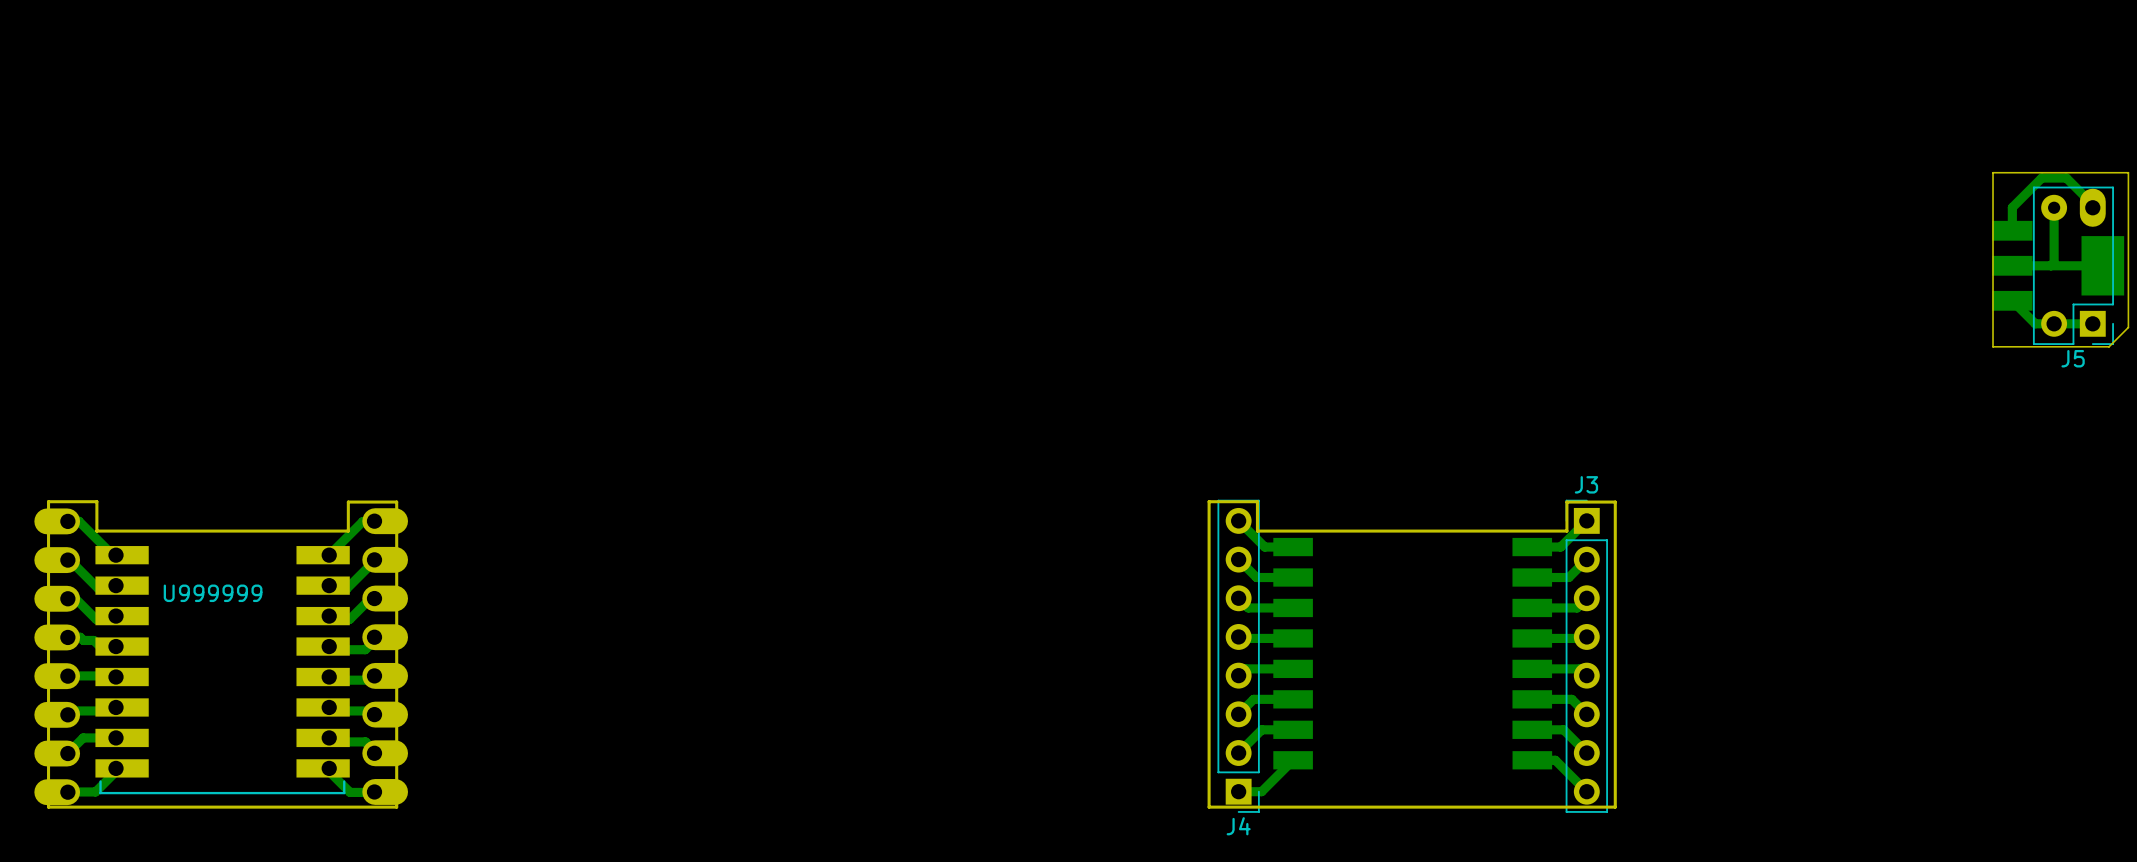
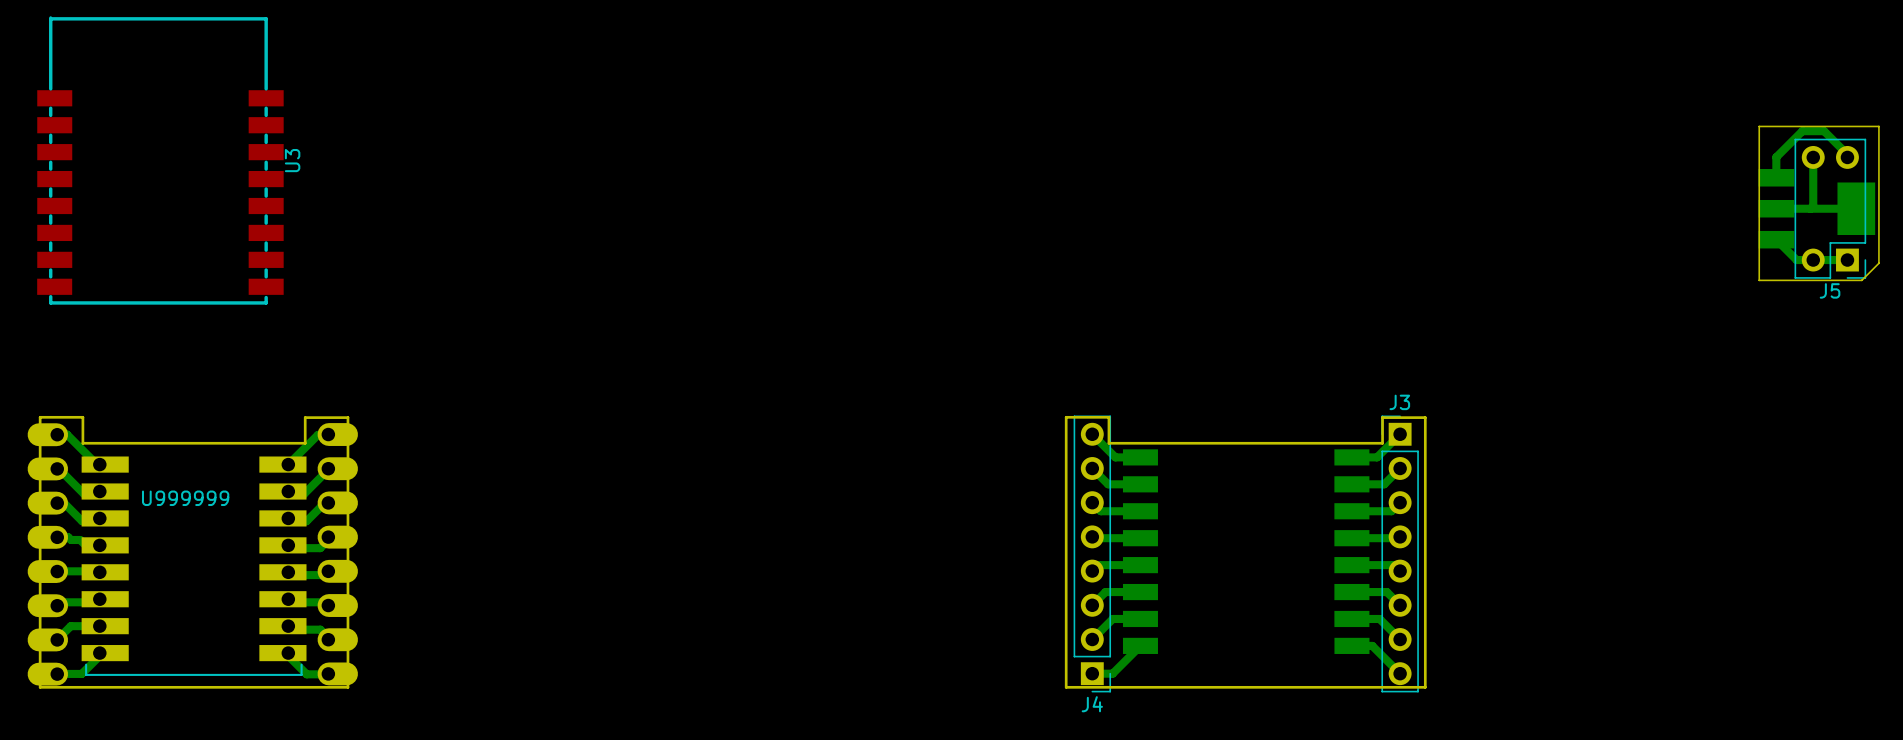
J5 footprint: [2032, 186, 2114, 345] -> [1794, 138, 1867, 279]
U3: none -> (160, 160)

